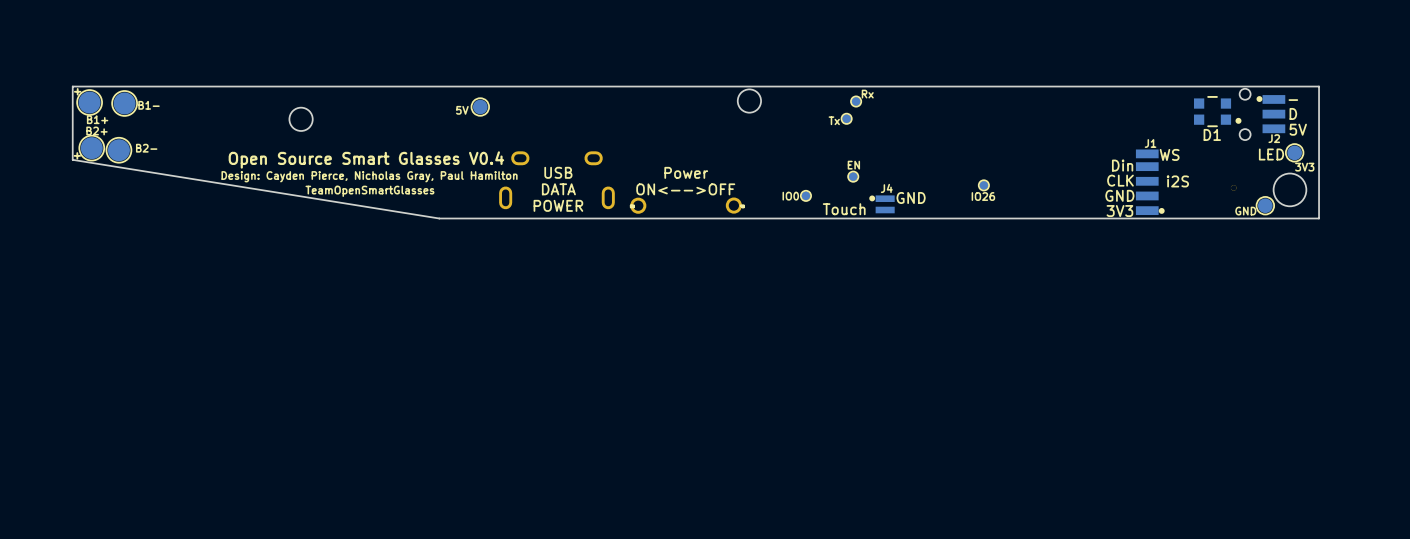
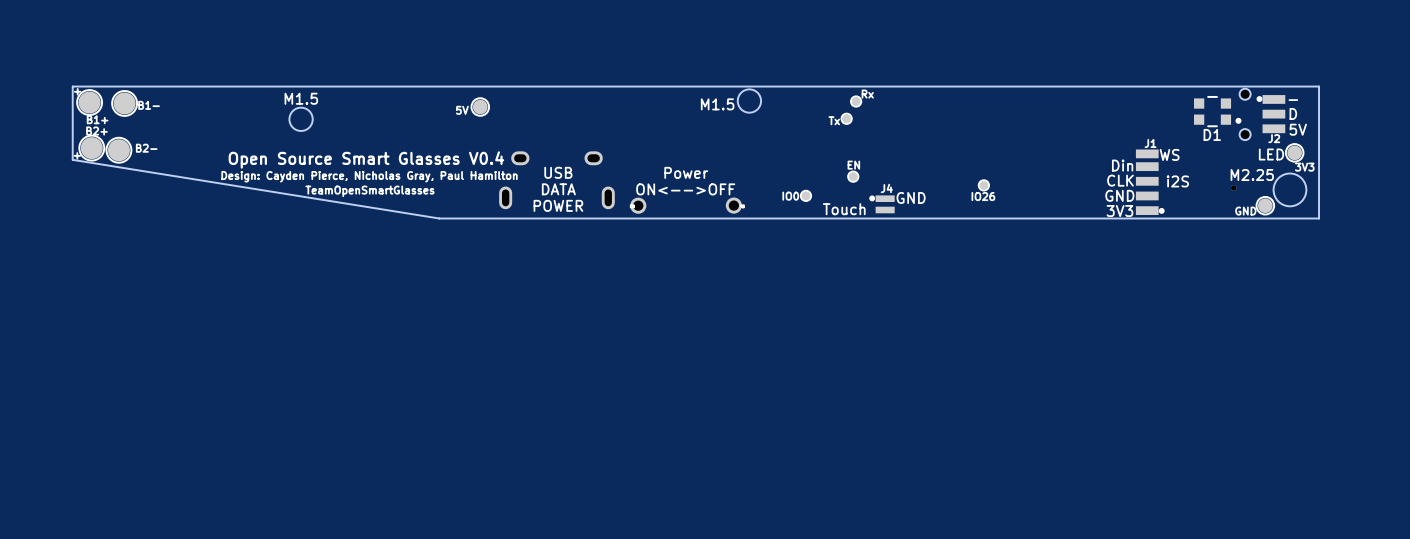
text: none -> M1.5 (301, 98)
text: none -> M1.5 (717, 104)
text: none -> M2.25 (1252, 175)

